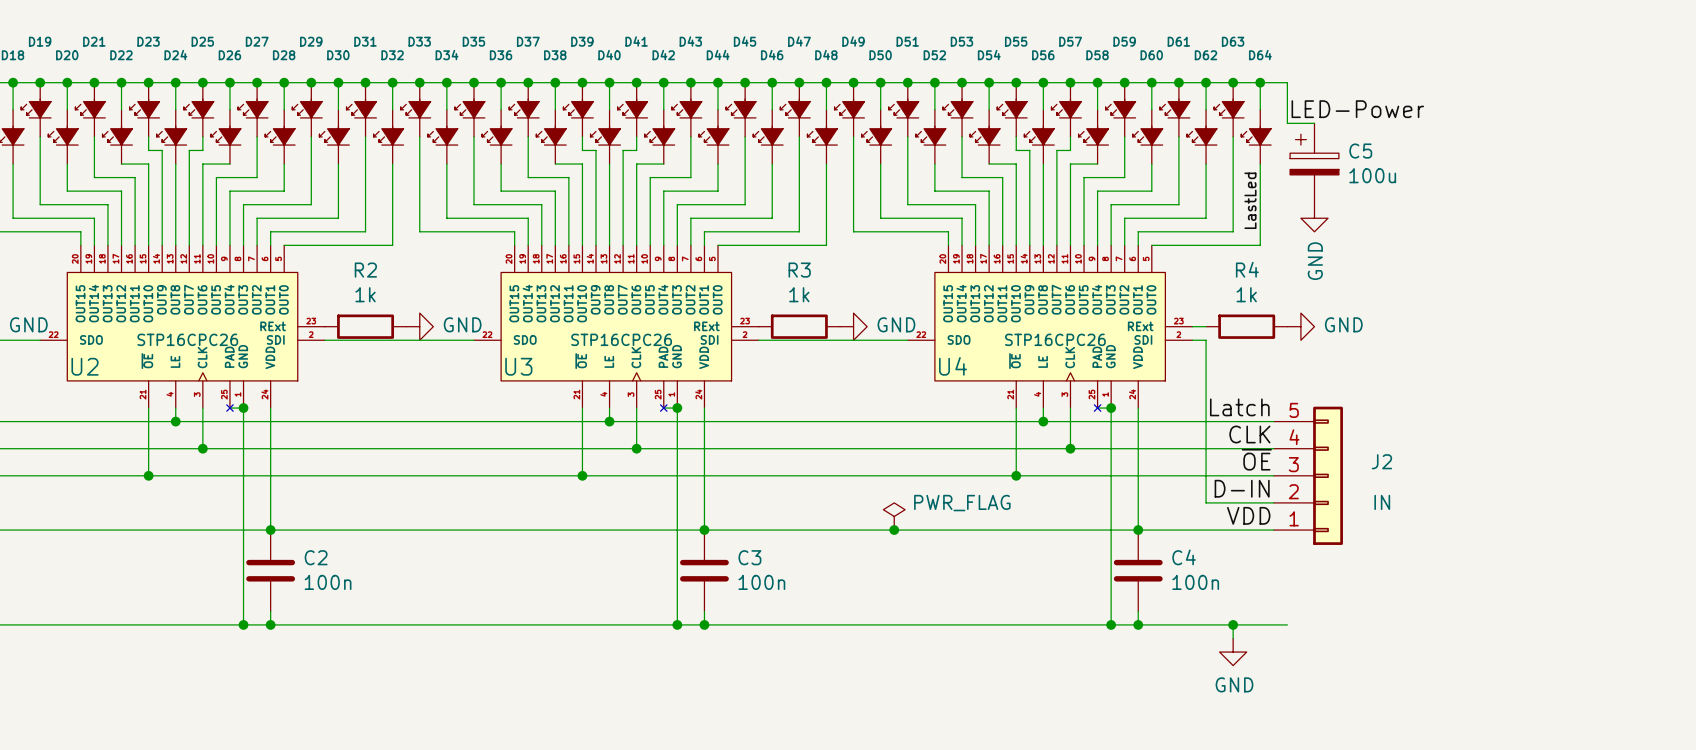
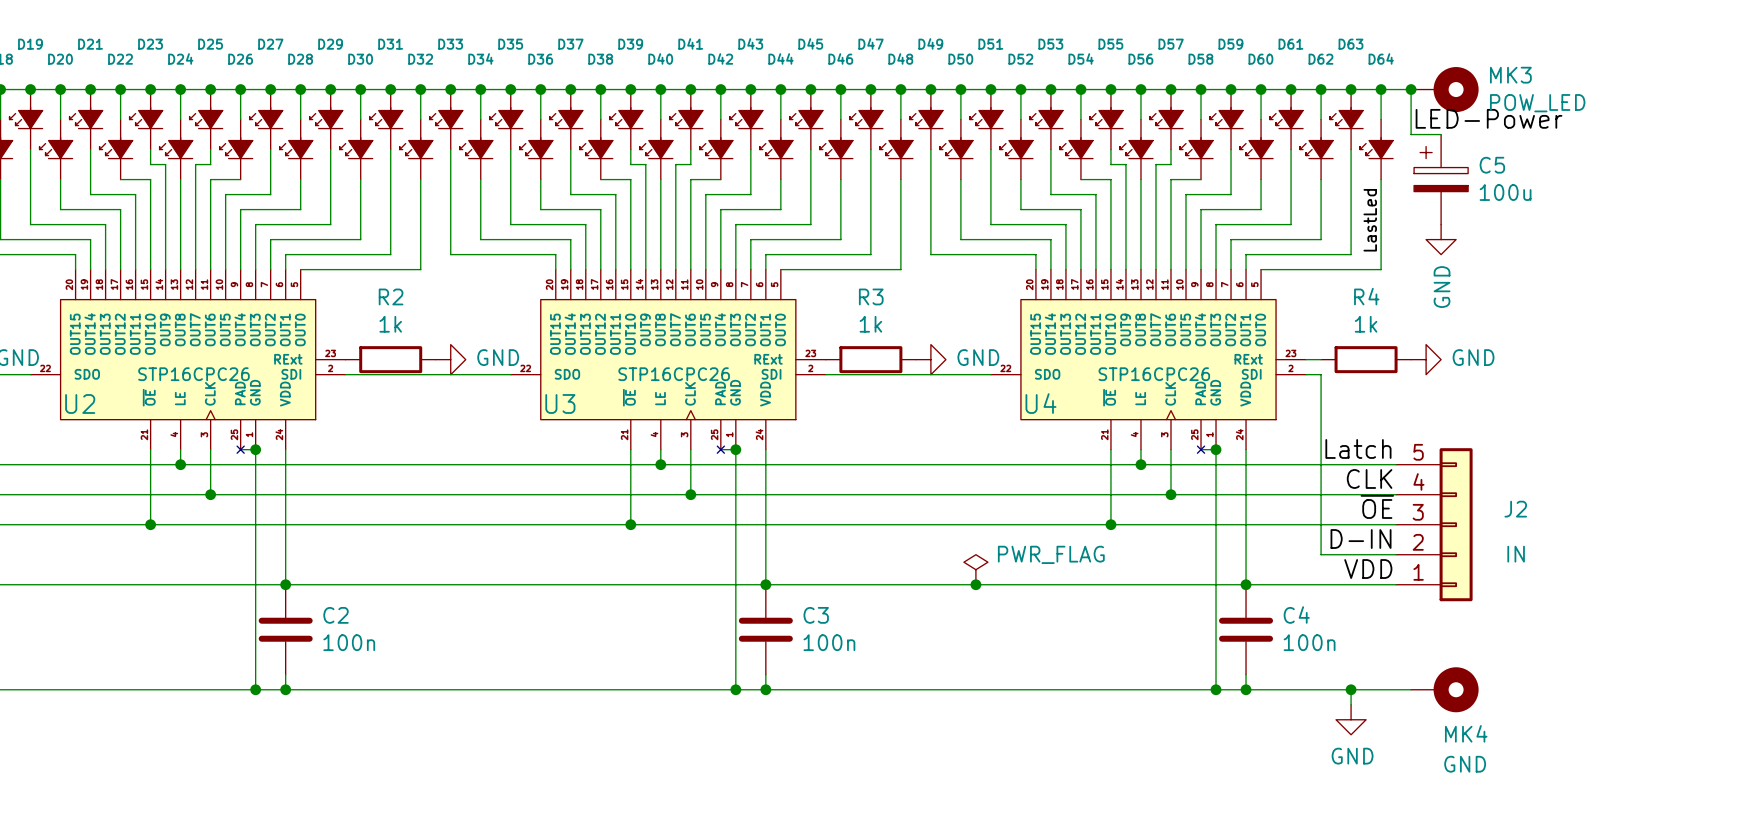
junction: none -> (1411, 89)
MK3: none -> POW_LED (1444, 89)
MK4: none -> GND (1444, 689)

